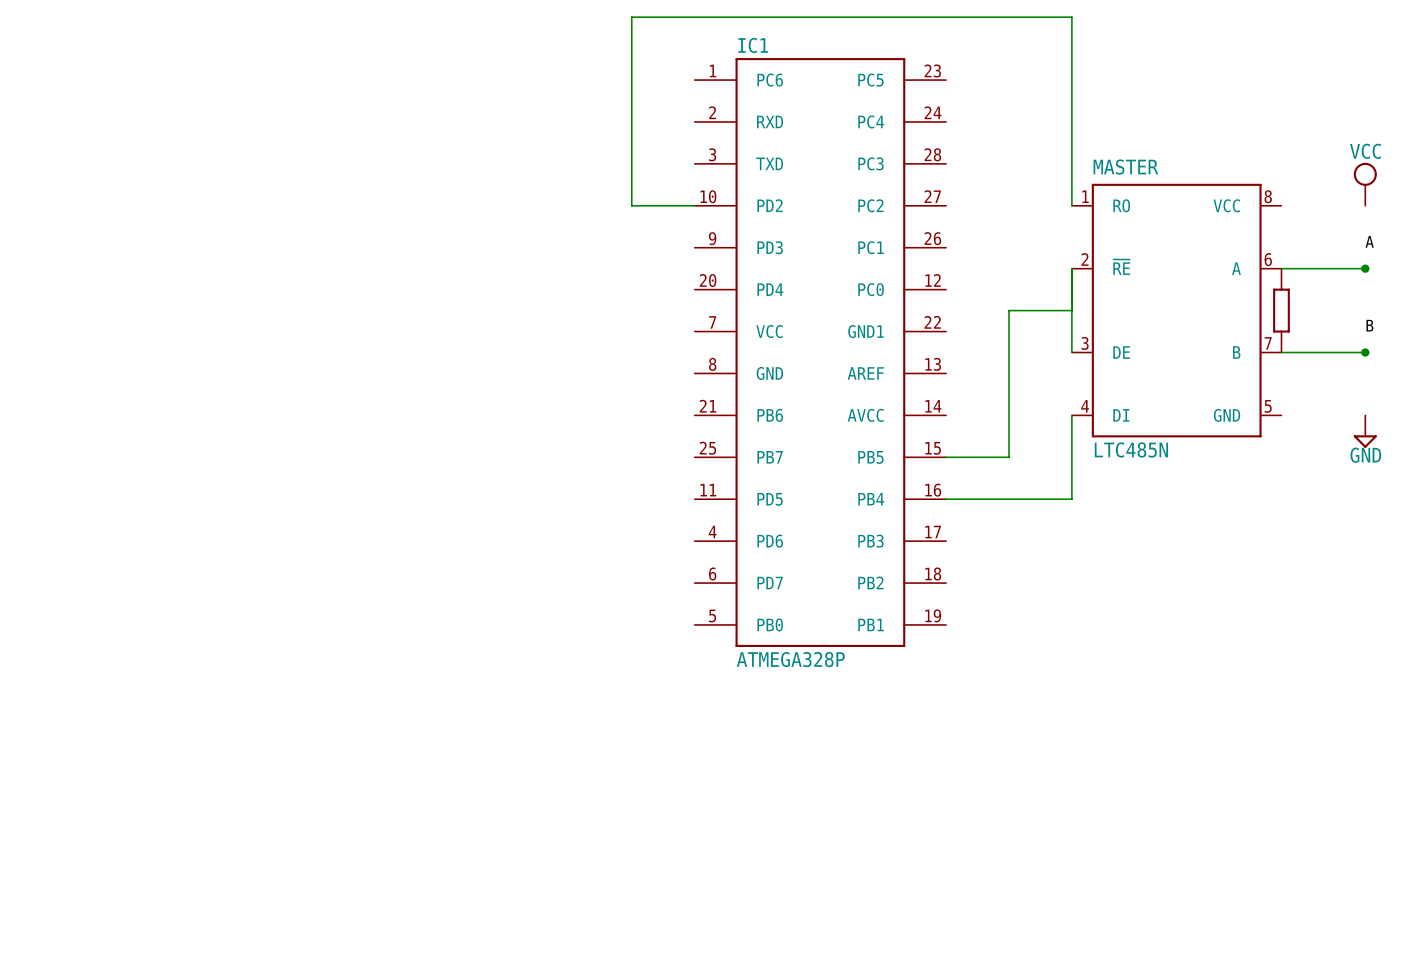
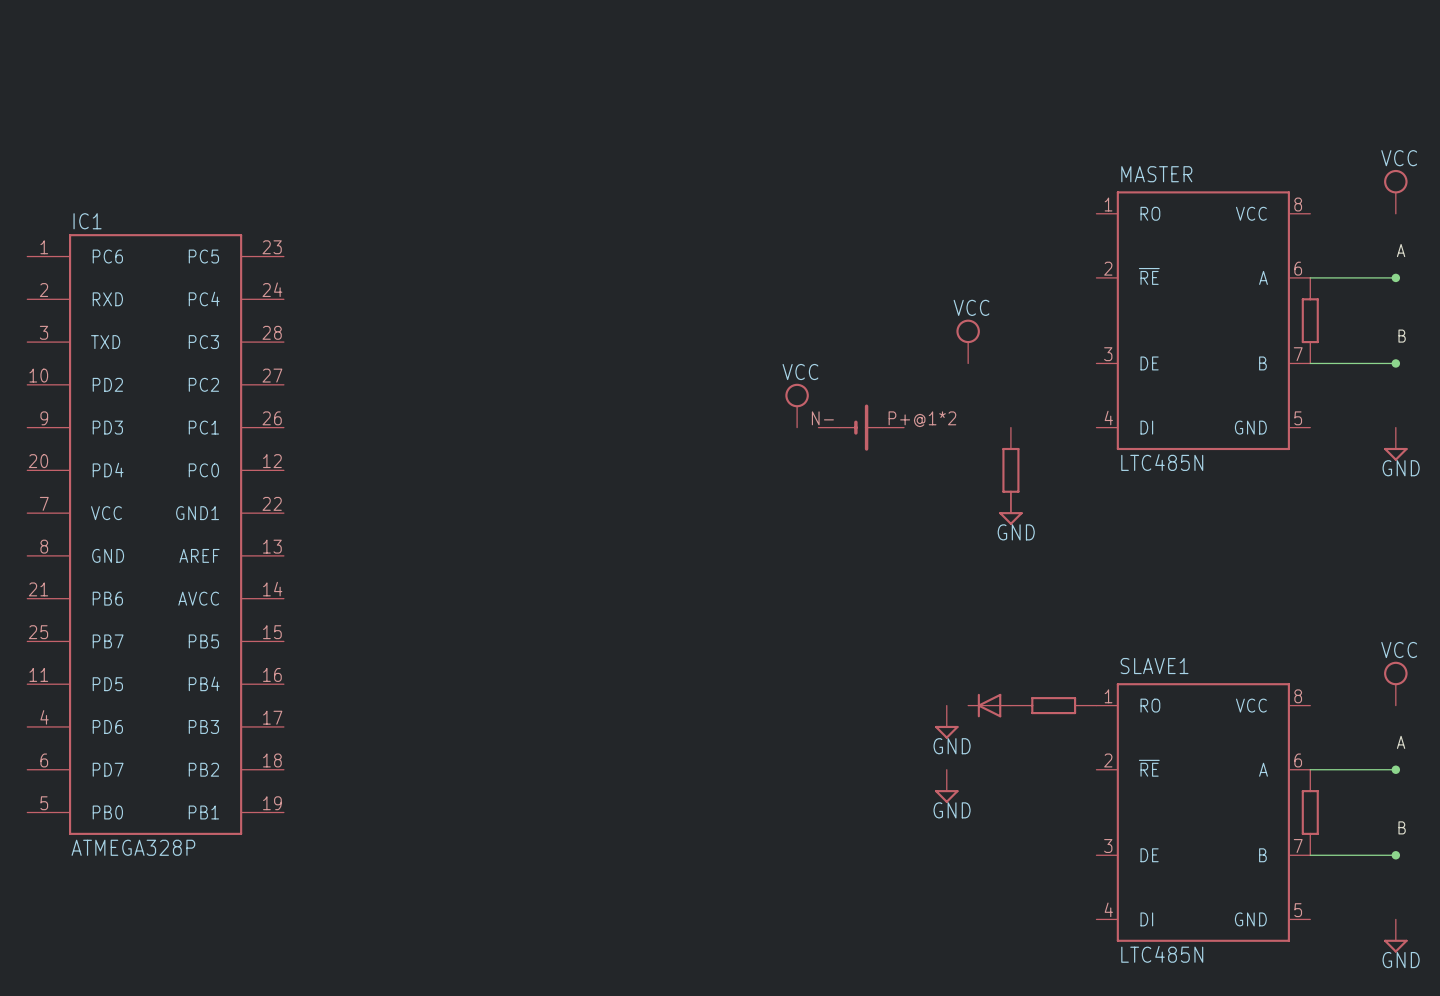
wire: (694, 205) (631, 205) (631, 17) (1071, 17) (1071, 205) -> none
wire: (1071, 268) (1071, 352) -> none
wire: (1071, 310) (1009, 310) (1009, 457) (946, 457) -> none
power symbol: none -> VCC (968, 341)
IC1 position: (820, 352) -> (155, 534)
power symbol: none -> VCC (797, 405)
part: none -> (861, 427)
wire: (1071, 415) (1071, 499) (946, 499) -> none
part: none -> (1010, 470)
power symbol: none -> GND (1010, 508)
power symbol: none -> VCC (1395, 683)
part: none -> (989, 705)
part: none -> (1053, 705)
power symbol: none -> GND (946, 722)
label: none -> A (1401, 742)
wire: none -> (1310, 769) (1395, 769)
junction: none -> (1395, 769)
power symbol: none -> GND (946, 786)
SLAVE1: none -> LTC485N (1203, 812)
part: none -> (1310, 812)
label: none -> B (1402, 827)
wire: none -> (1310, 855) (1395, 855)
junction: none -> (1395, 855)
power symbol: none -> GND (1395, 935)

